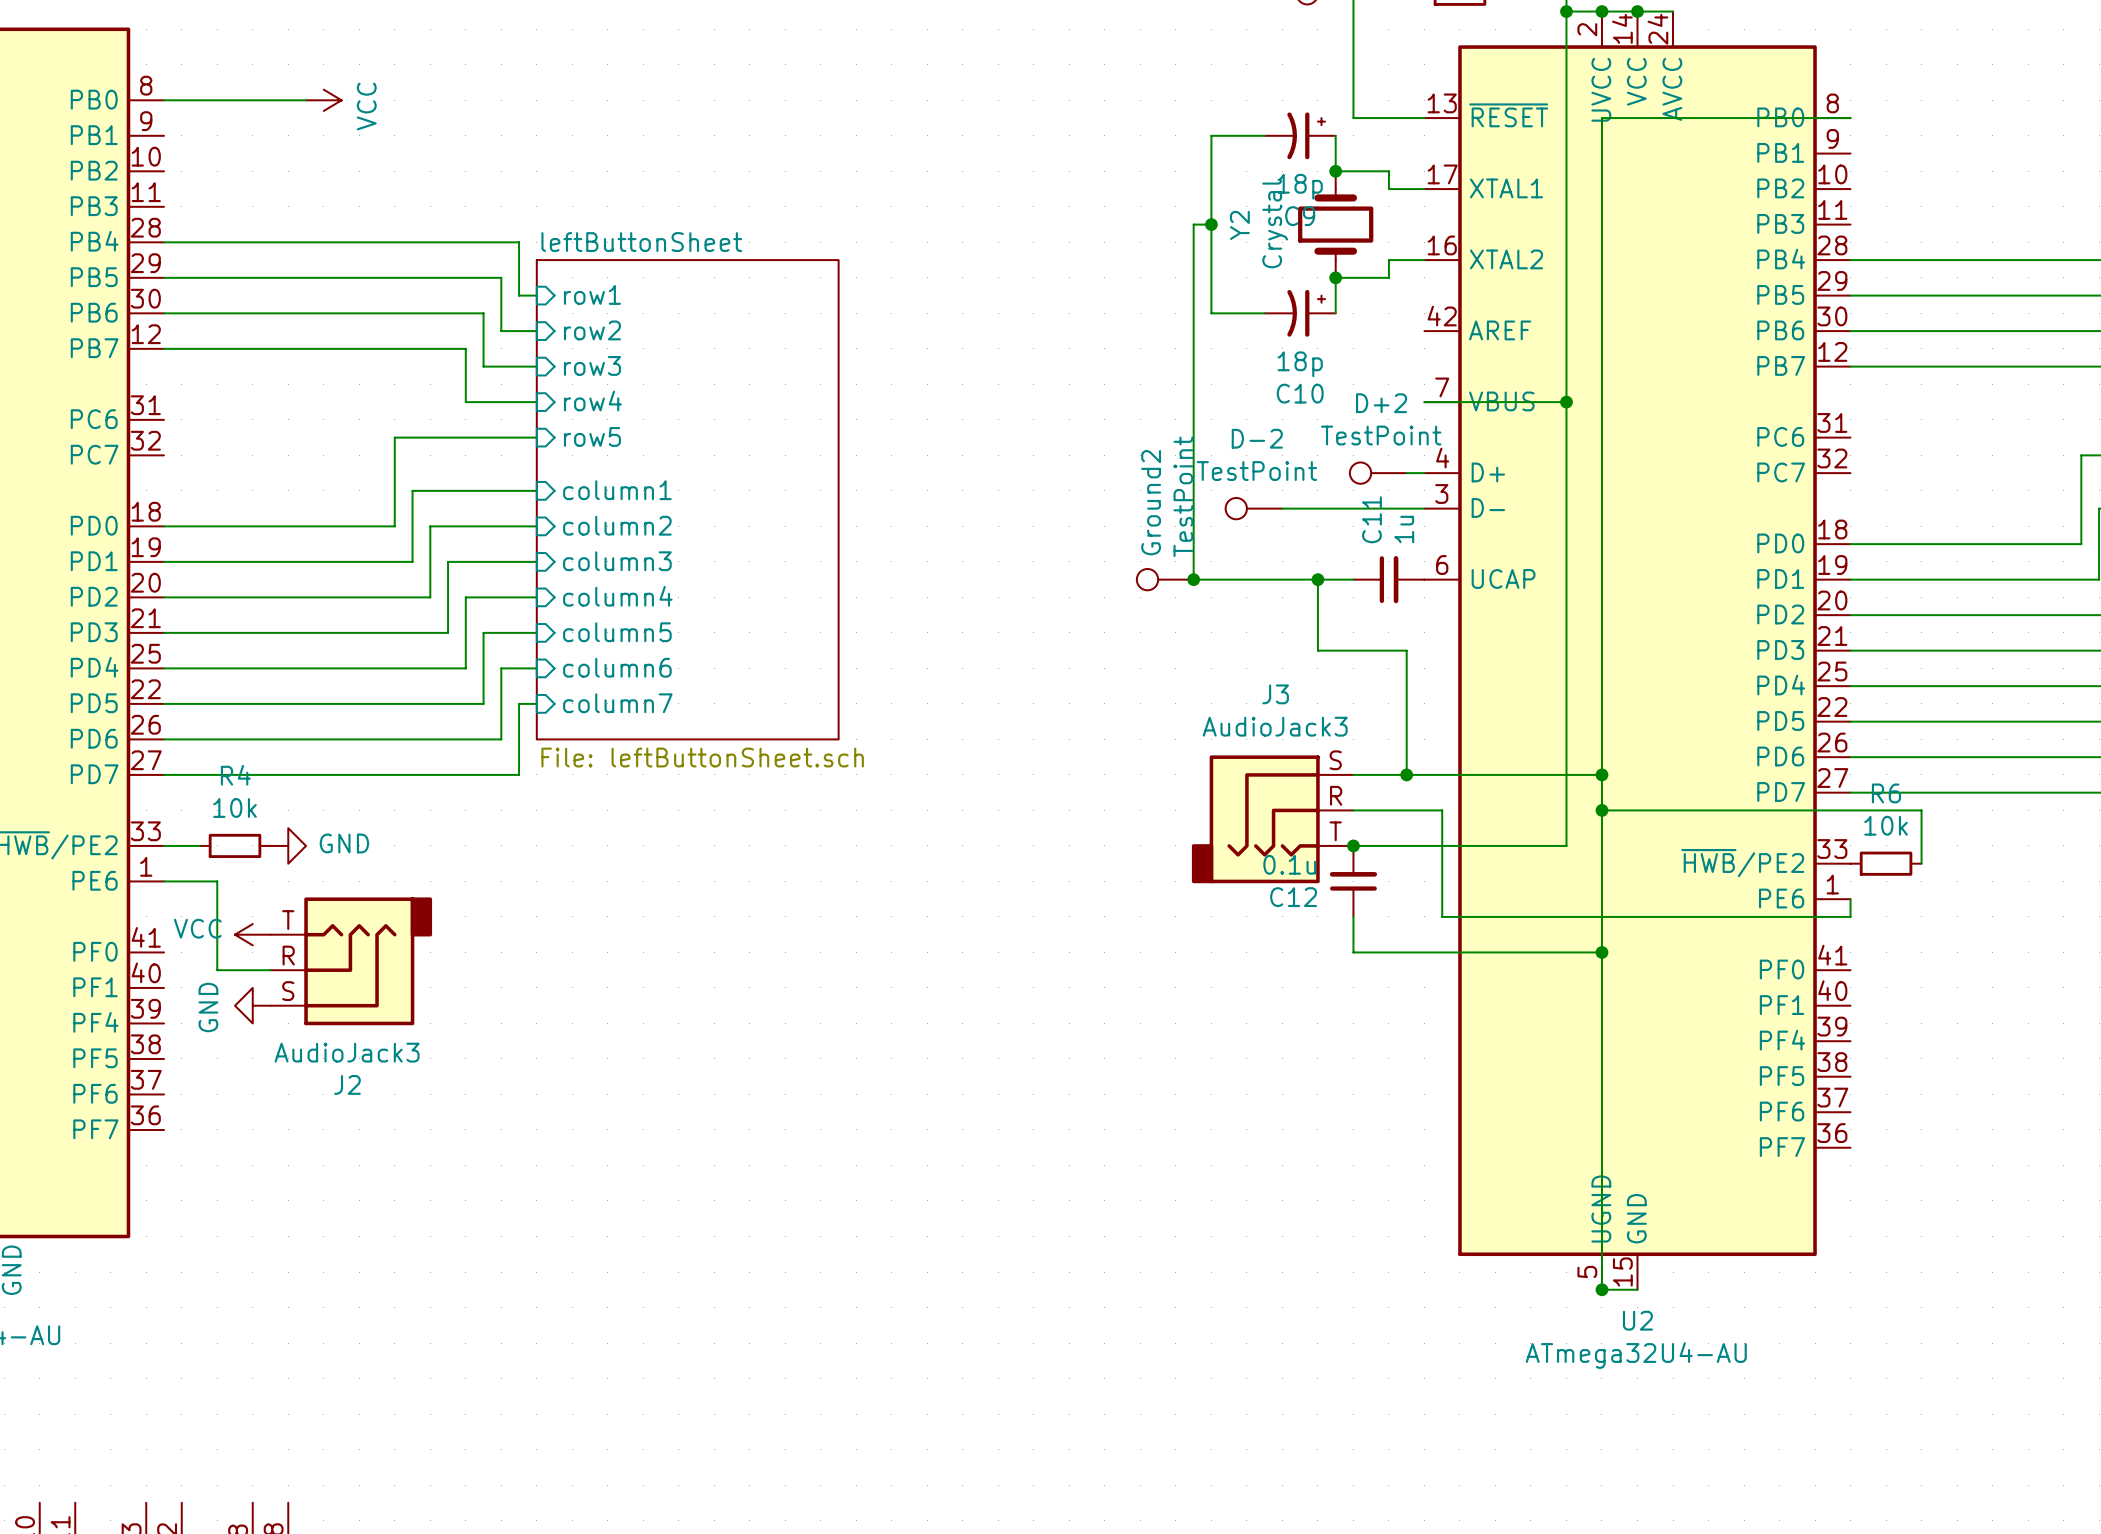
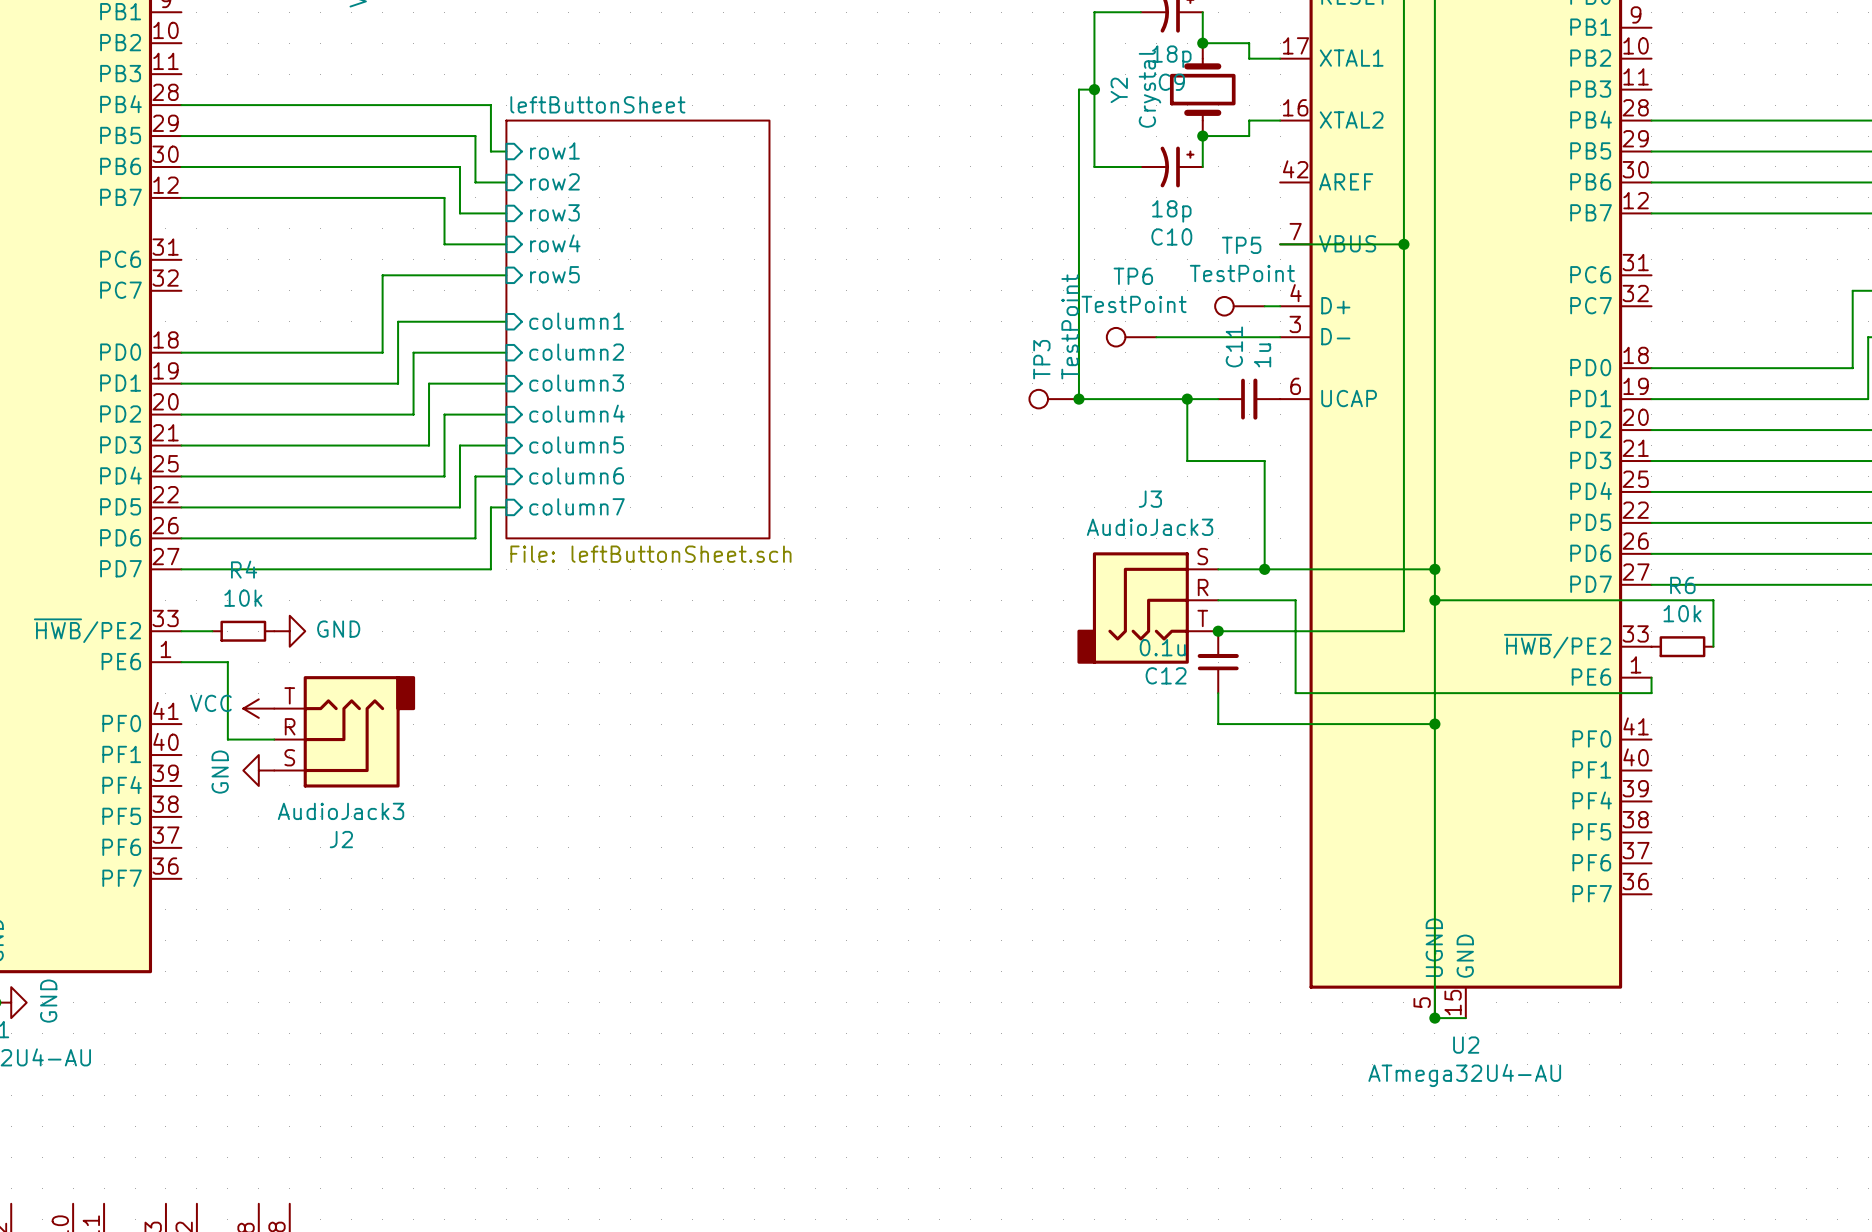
D+2 name: D+2 (1381, 403) -> TP5 (1241, 245)
D-2 name: D-2 (1257, 438) -> TP6 (1133, 276)
Ground2 name: Ground2 (1151, 502) -> TP3 (1041, 359)

